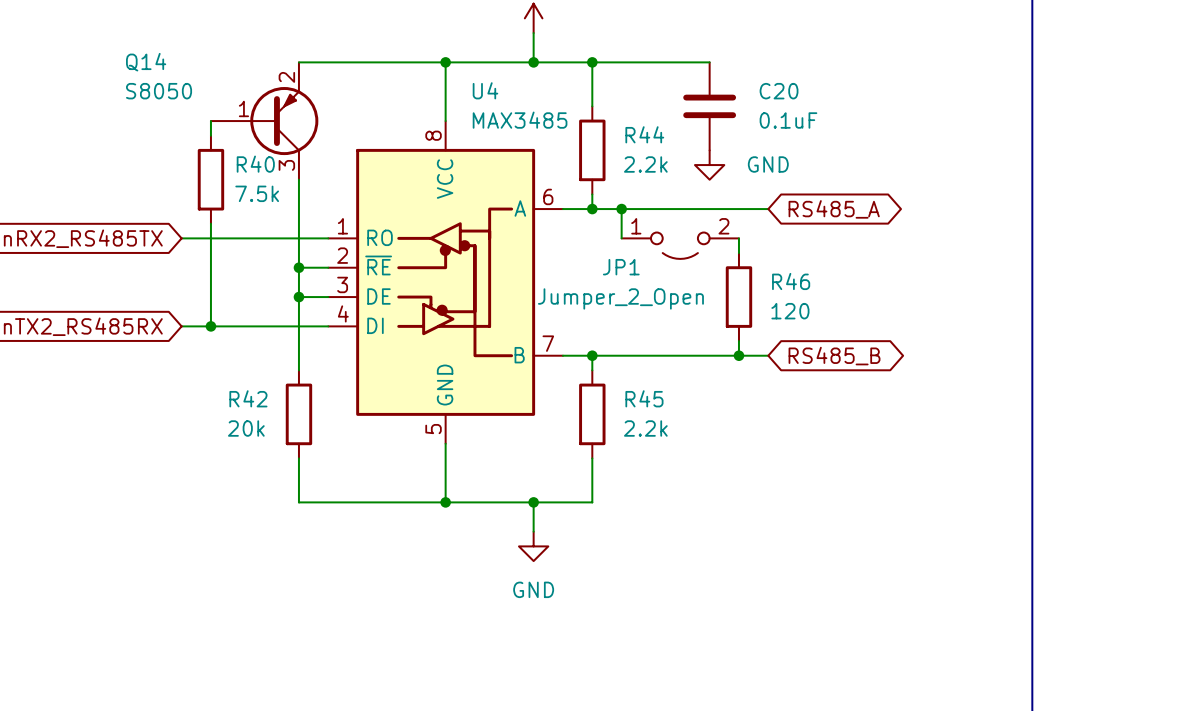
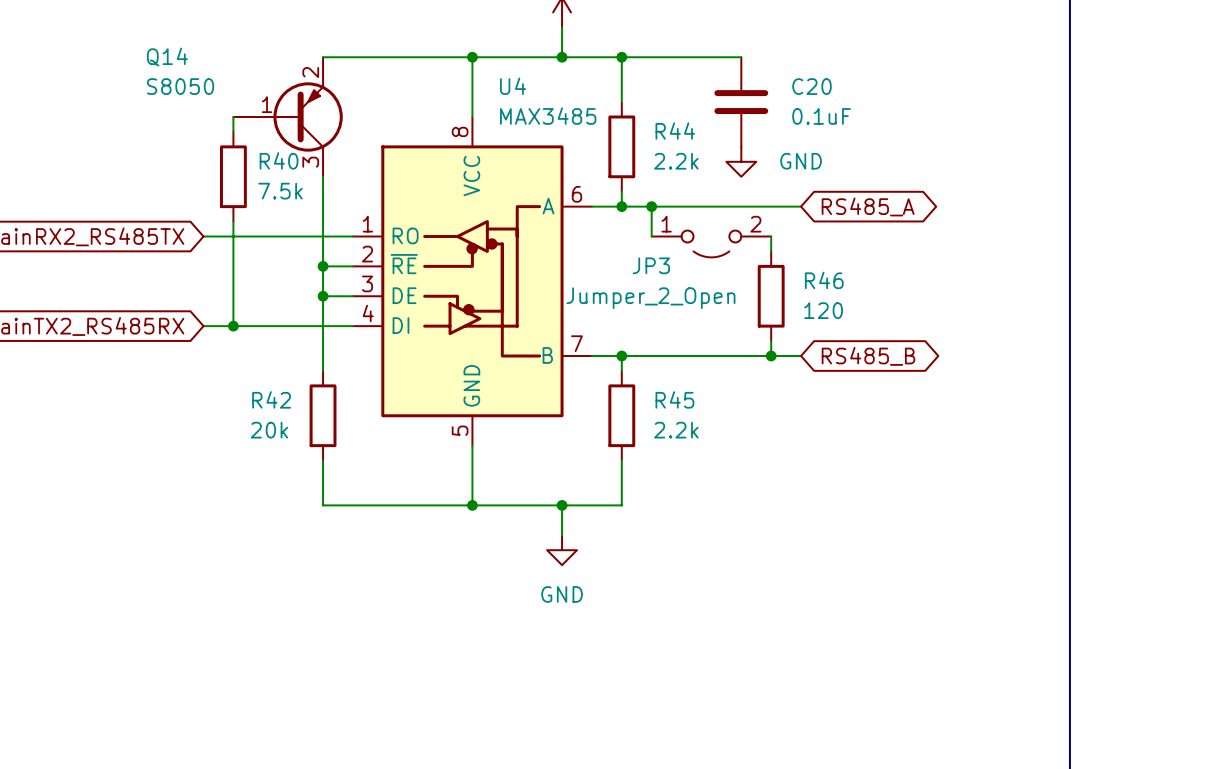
JP1 name: JP1 (621, 267) -> JP3 (651, 265)

